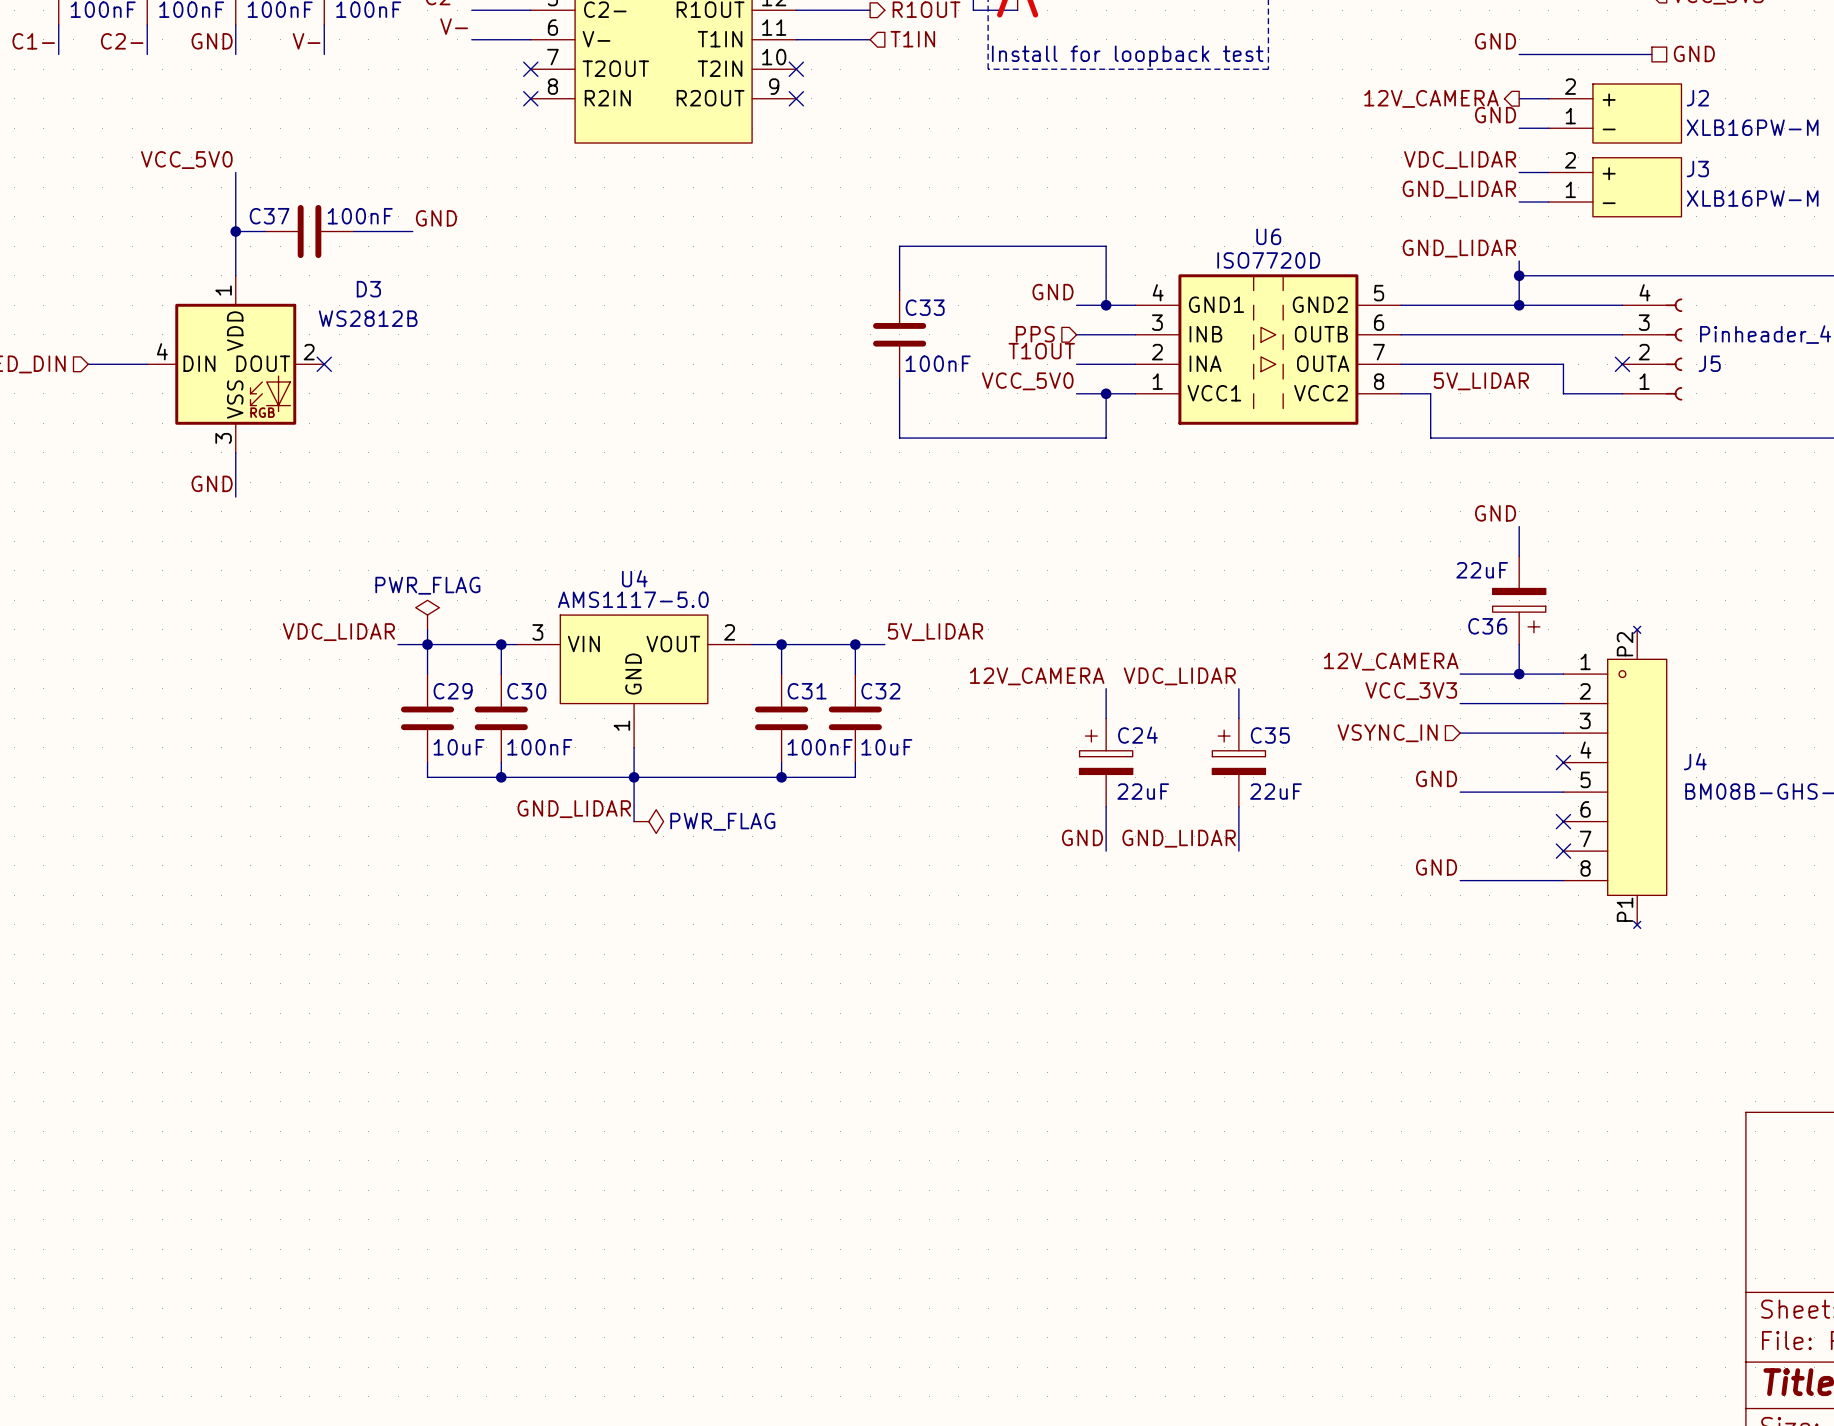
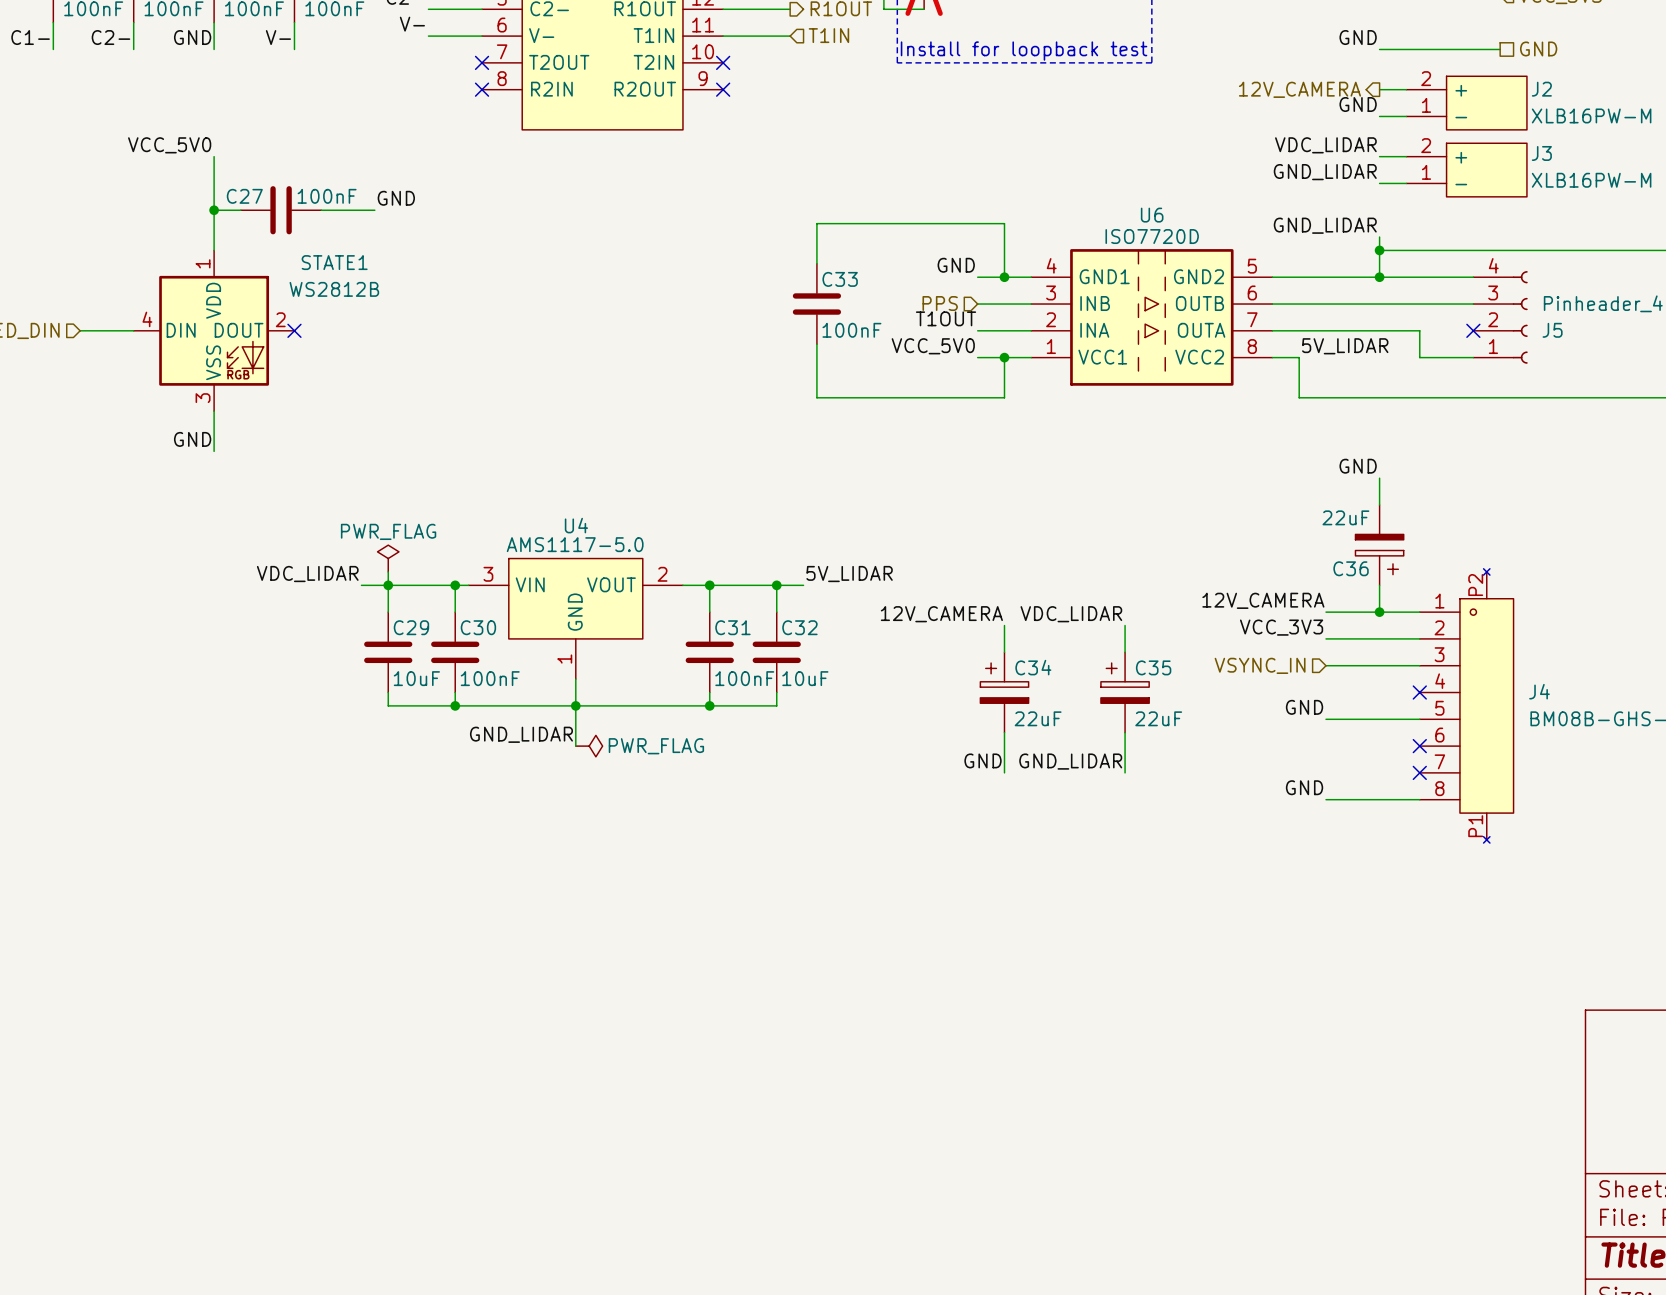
C37 name: C37 (269, 216) -> C27 (244, 196)
D3 name: D3 (368, 289) -> STATE1 (334, 262)
C24 name: C24 (1137, 735) -> C34 (1033, 667)

